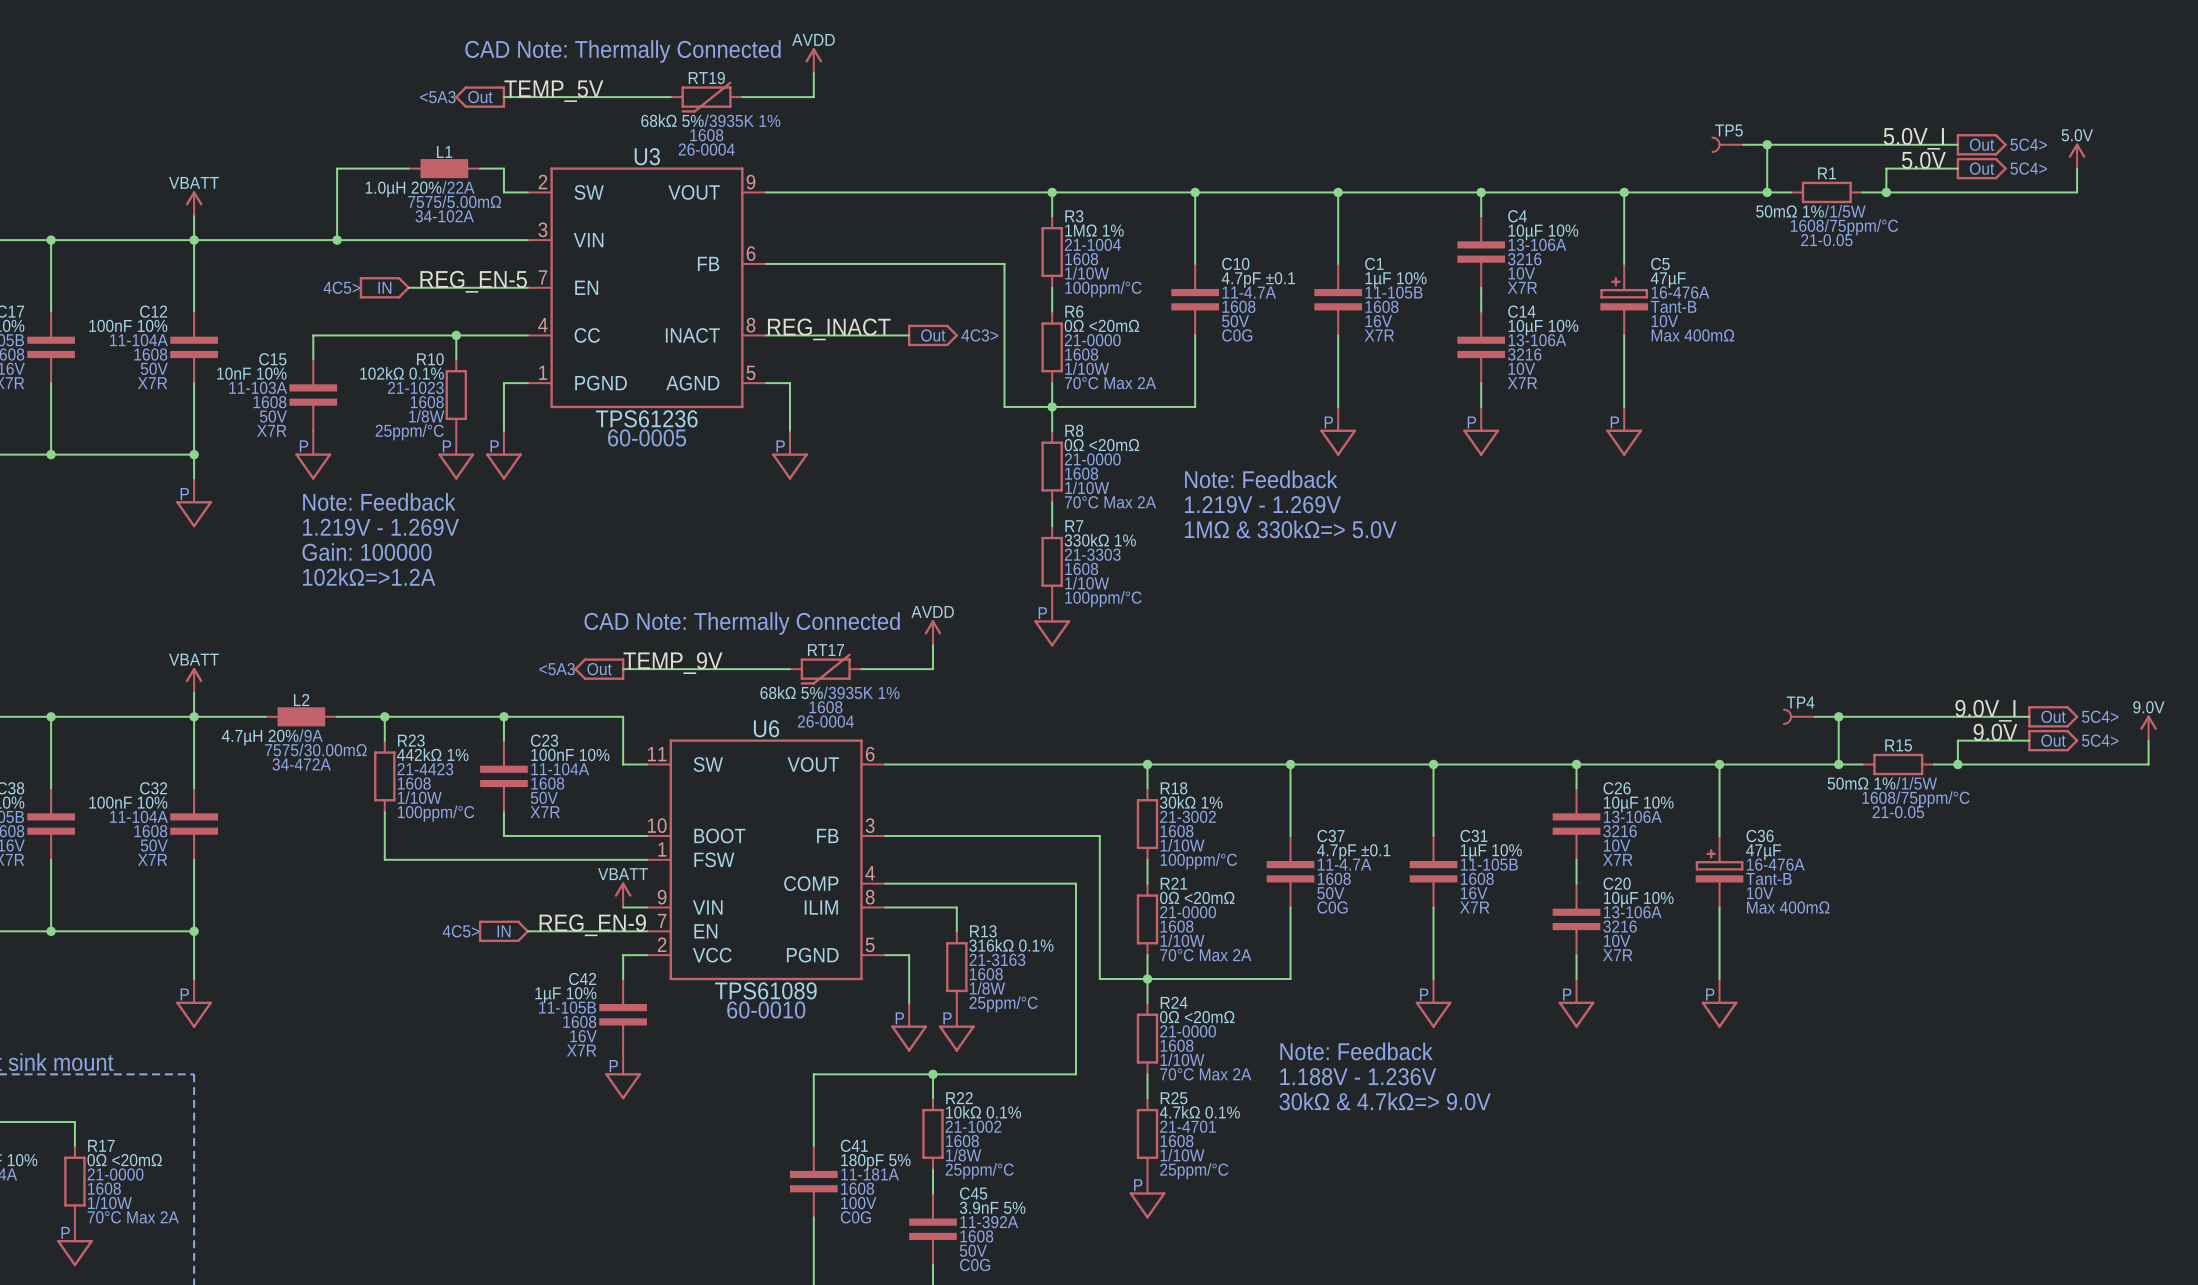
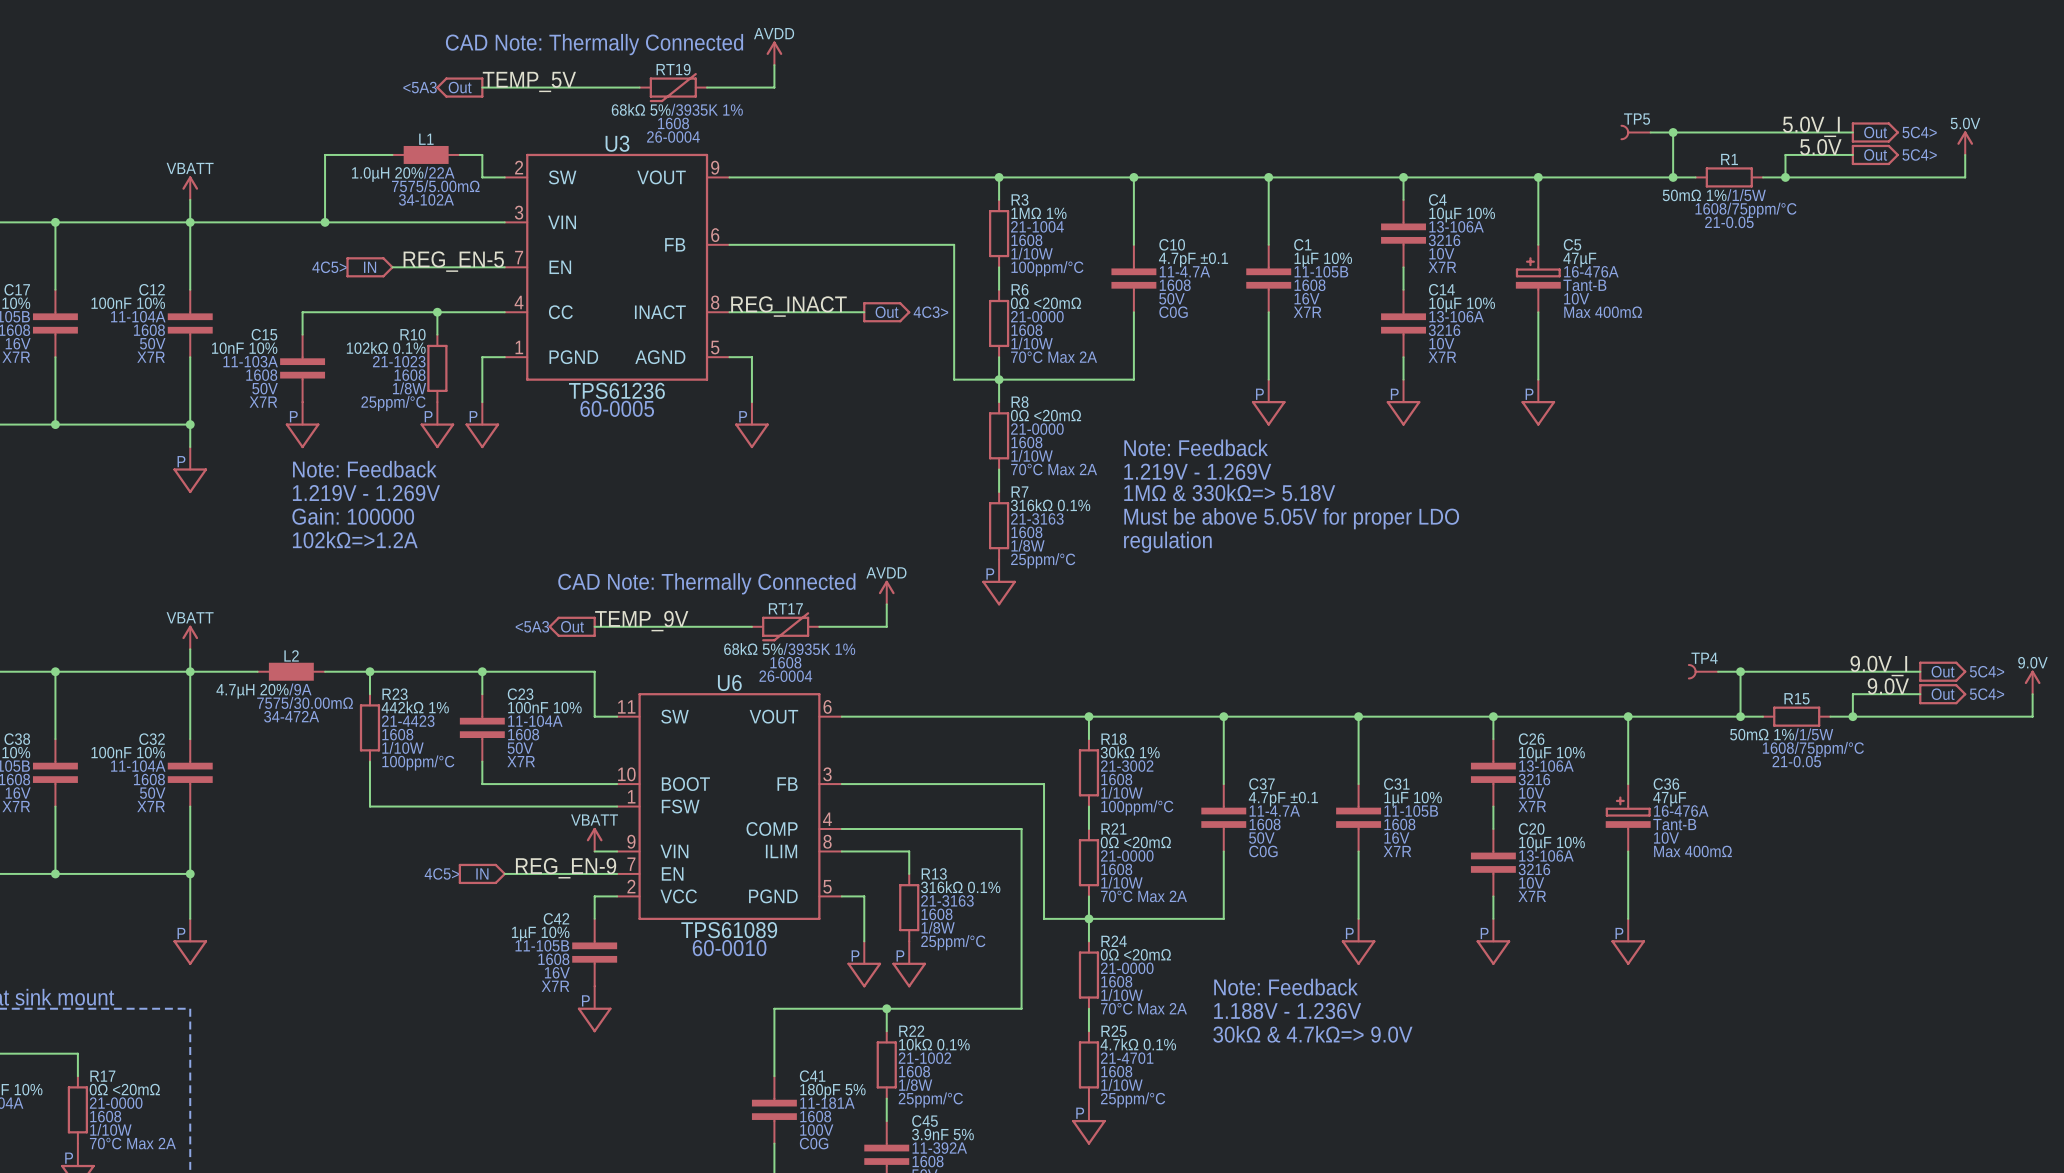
text: 1MΩ & 330kΩ=> 5.0V (1290, 529) -> 1MΩ & 330kΩ=> 5.18V (1229, 492)
R7 value: 330kΩ 1% (1100, 540) -> 316kΩ 0.1% (1050, 505)
R7 text: 21-3303 (1092, 554) -> 21-3163 (1037, 518)
text: none -> Must be above 5.05V for proper LDO (1291, 518)
text: none -> regulation (1167, 542)
R7 text: 1/10W (1087, 583) -> 1/8W (1028, 545)
R7 text: 100ppm/°C (1103, 599) -> 25ppm/°C (1043, 560)

